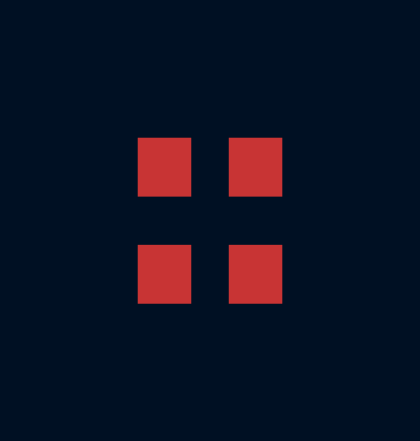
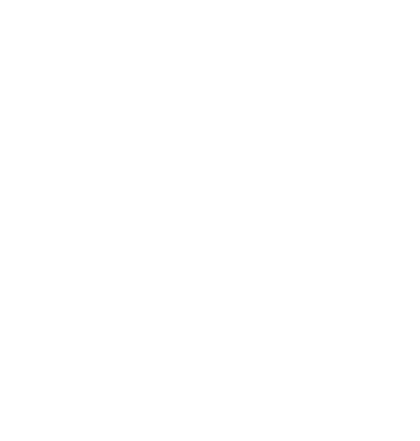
part: (210, 167) -> none
part: (210, 274) -> none

